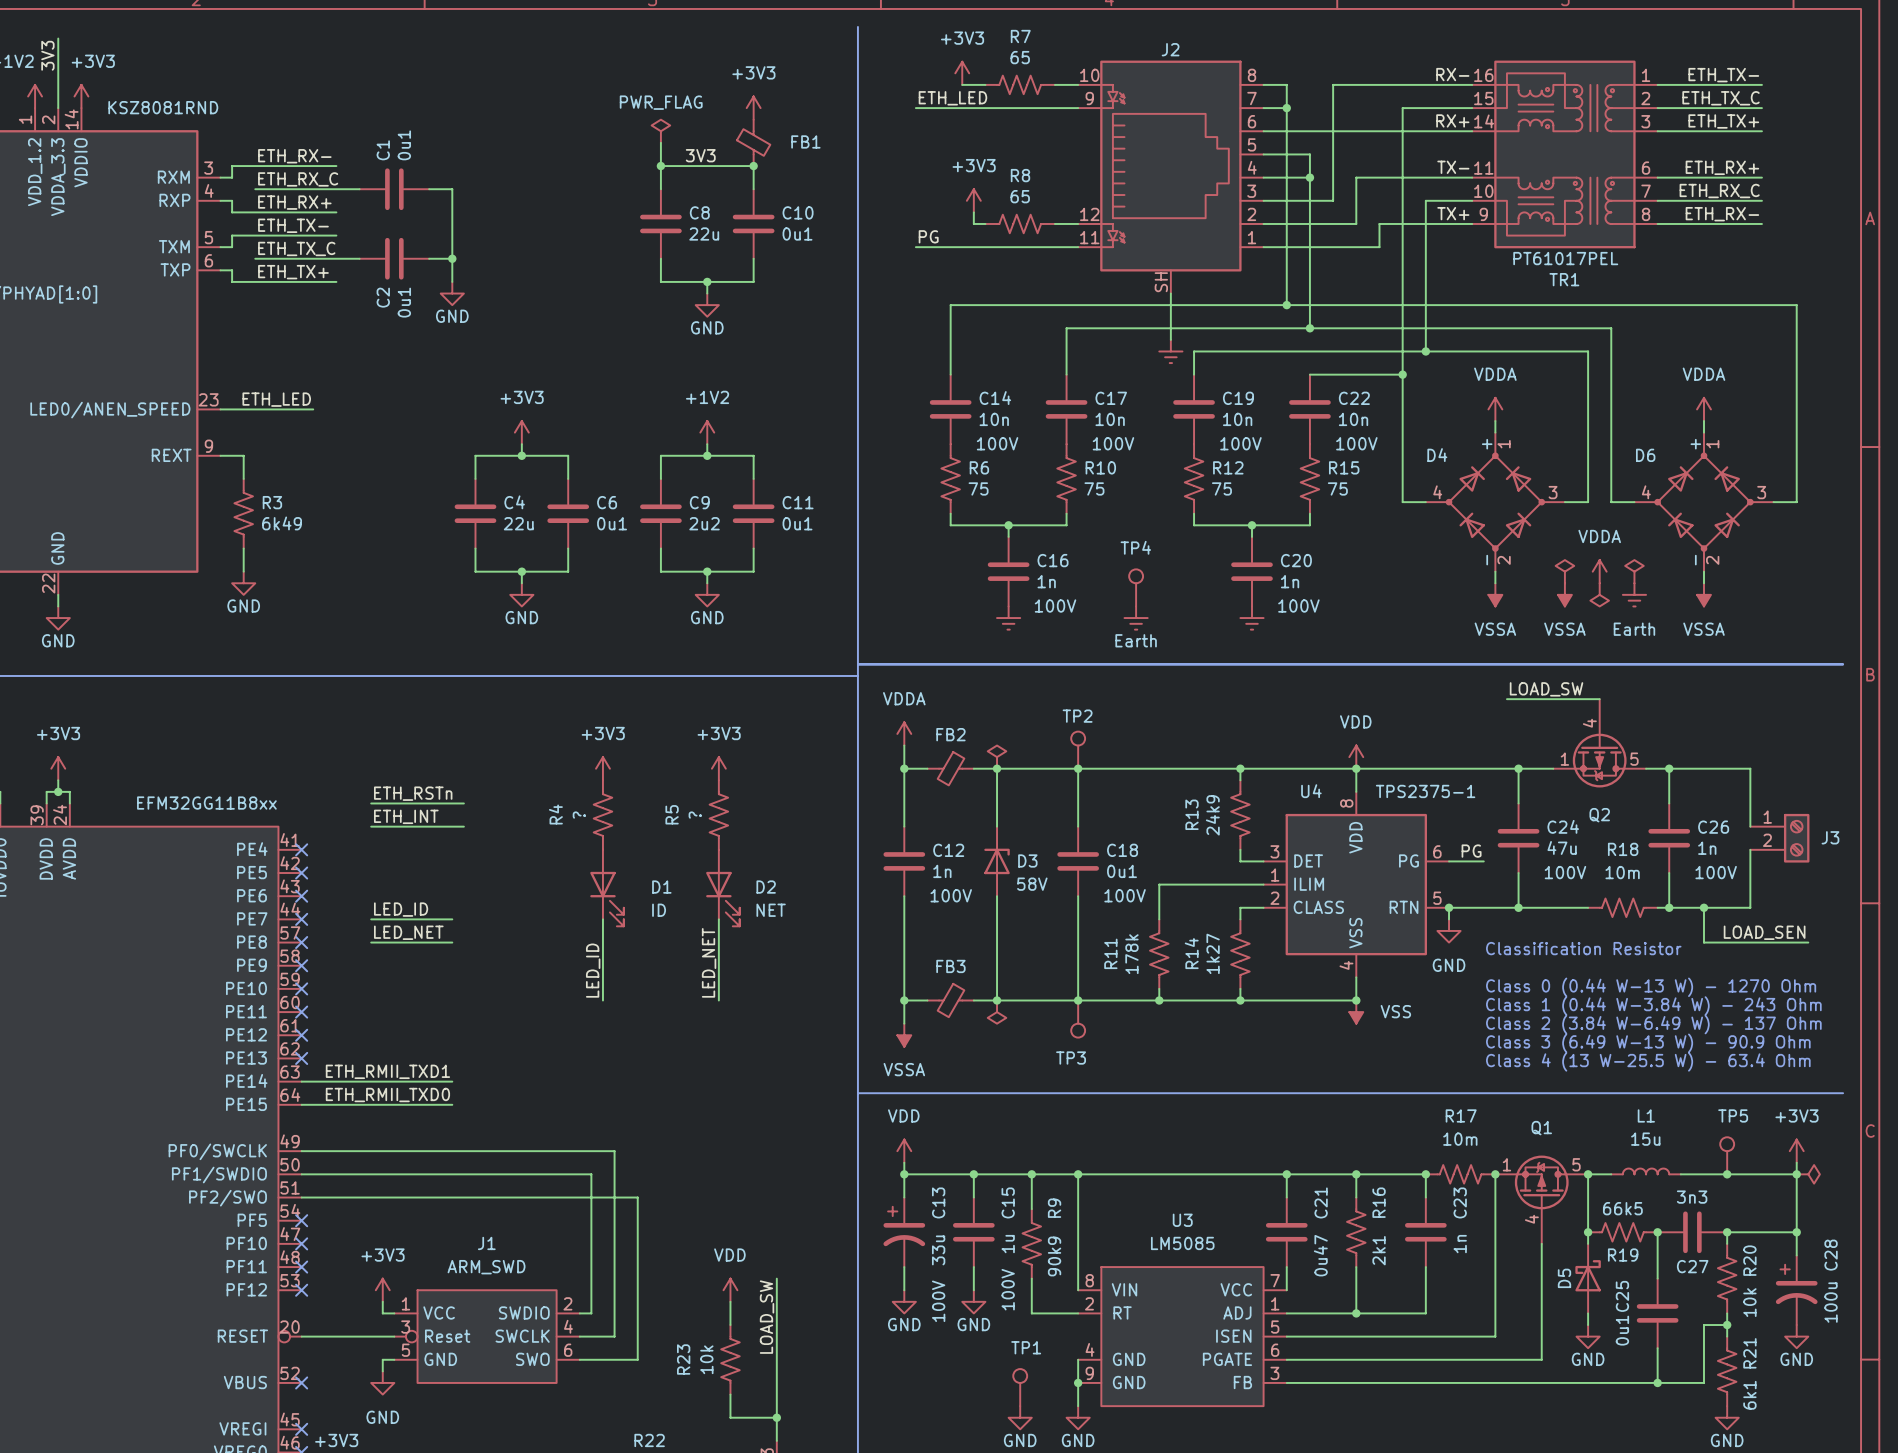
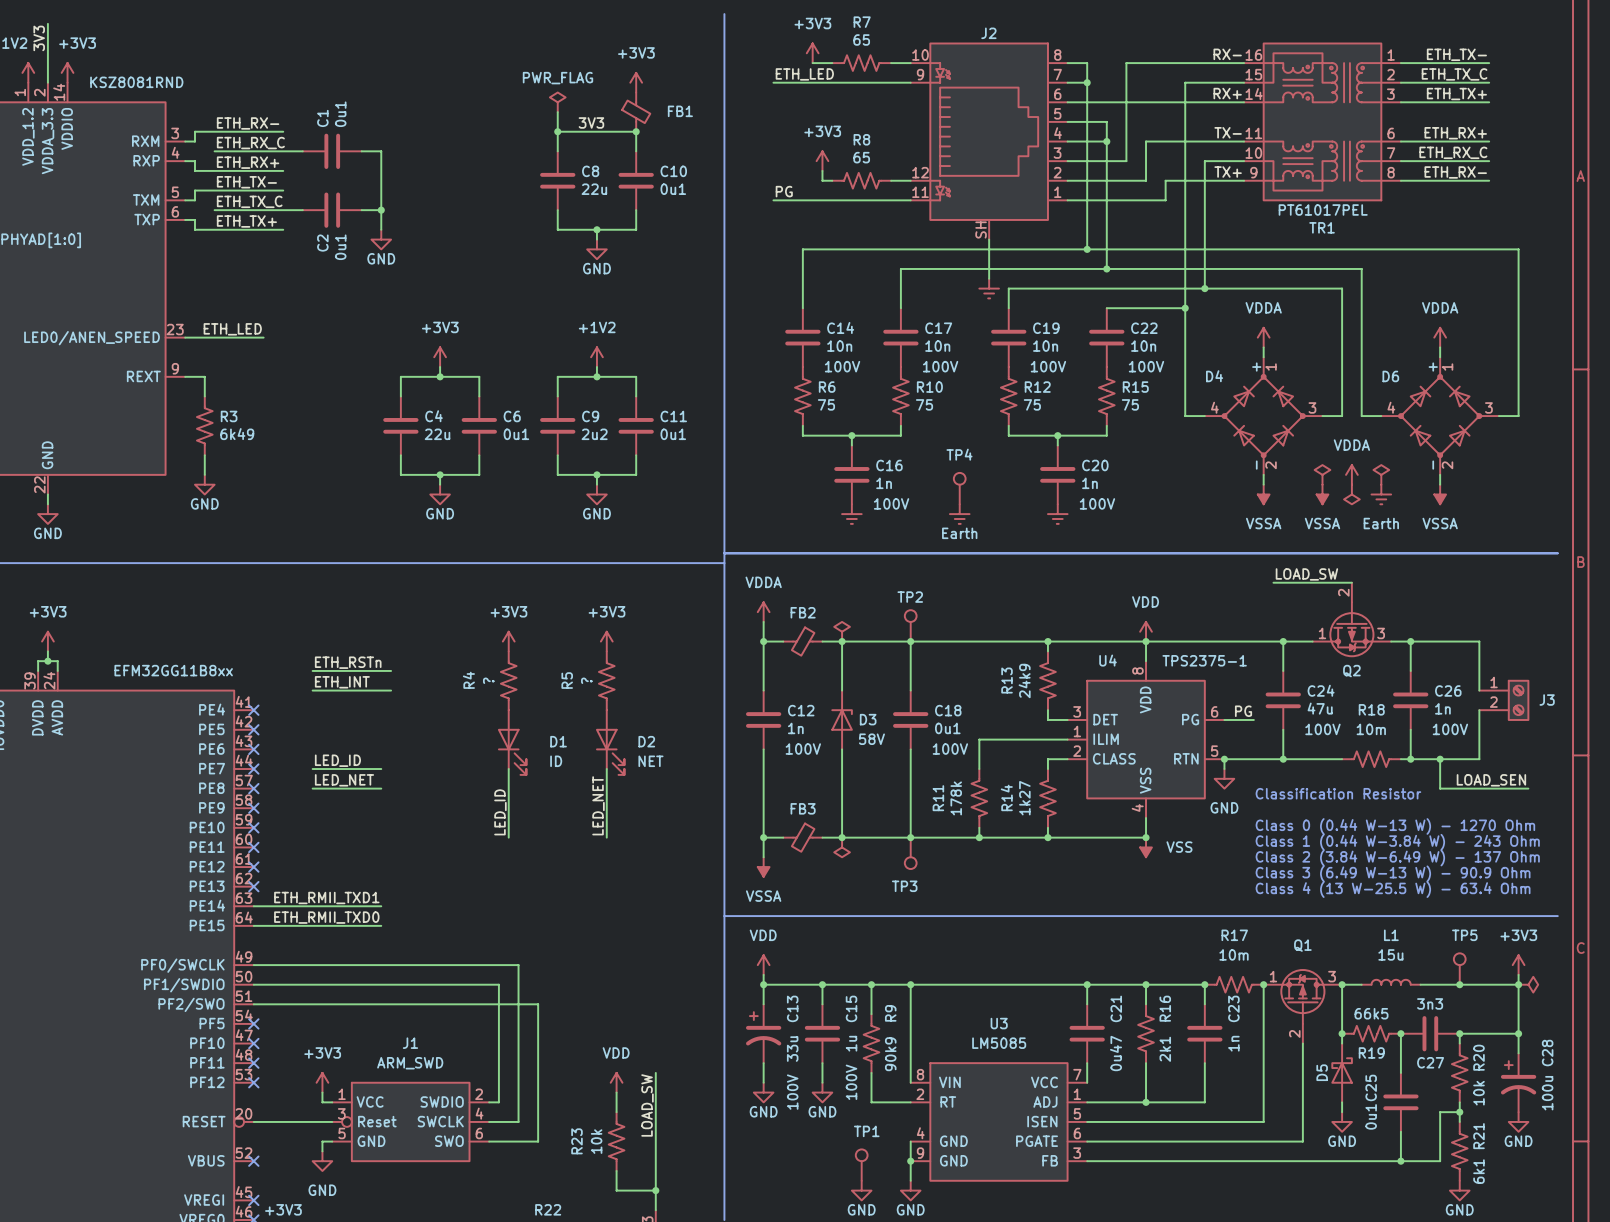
Q2 symbol: [1553, 699, 1647, 788] -> [1312, 582, 1392, 658]
Q1 symbol: [1495, 1155, 1589, 1244] -> [1263, 969, 1343, 1044]

